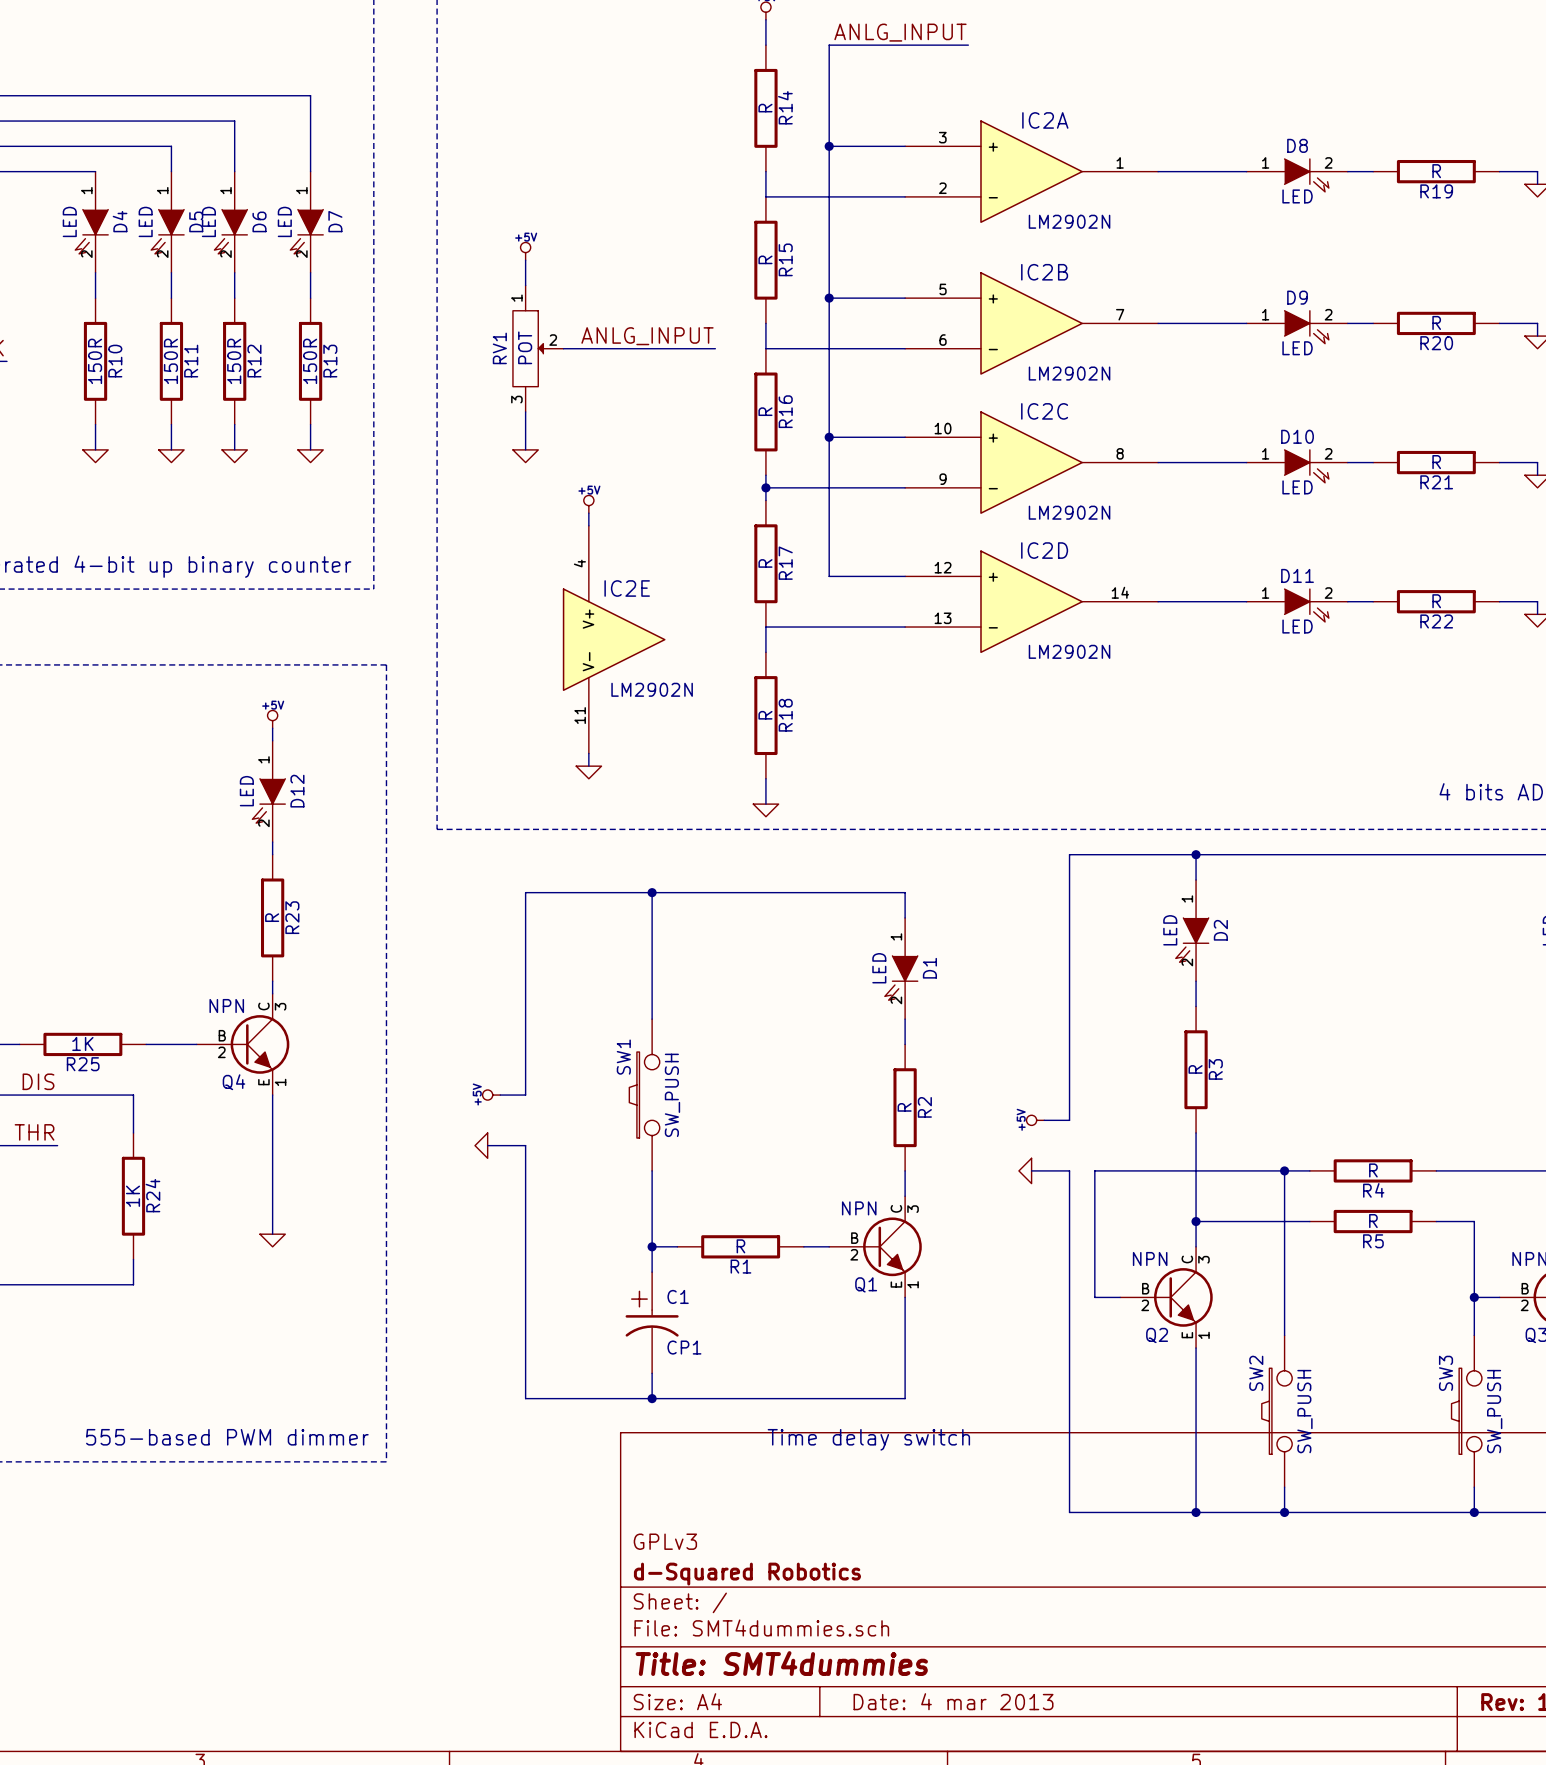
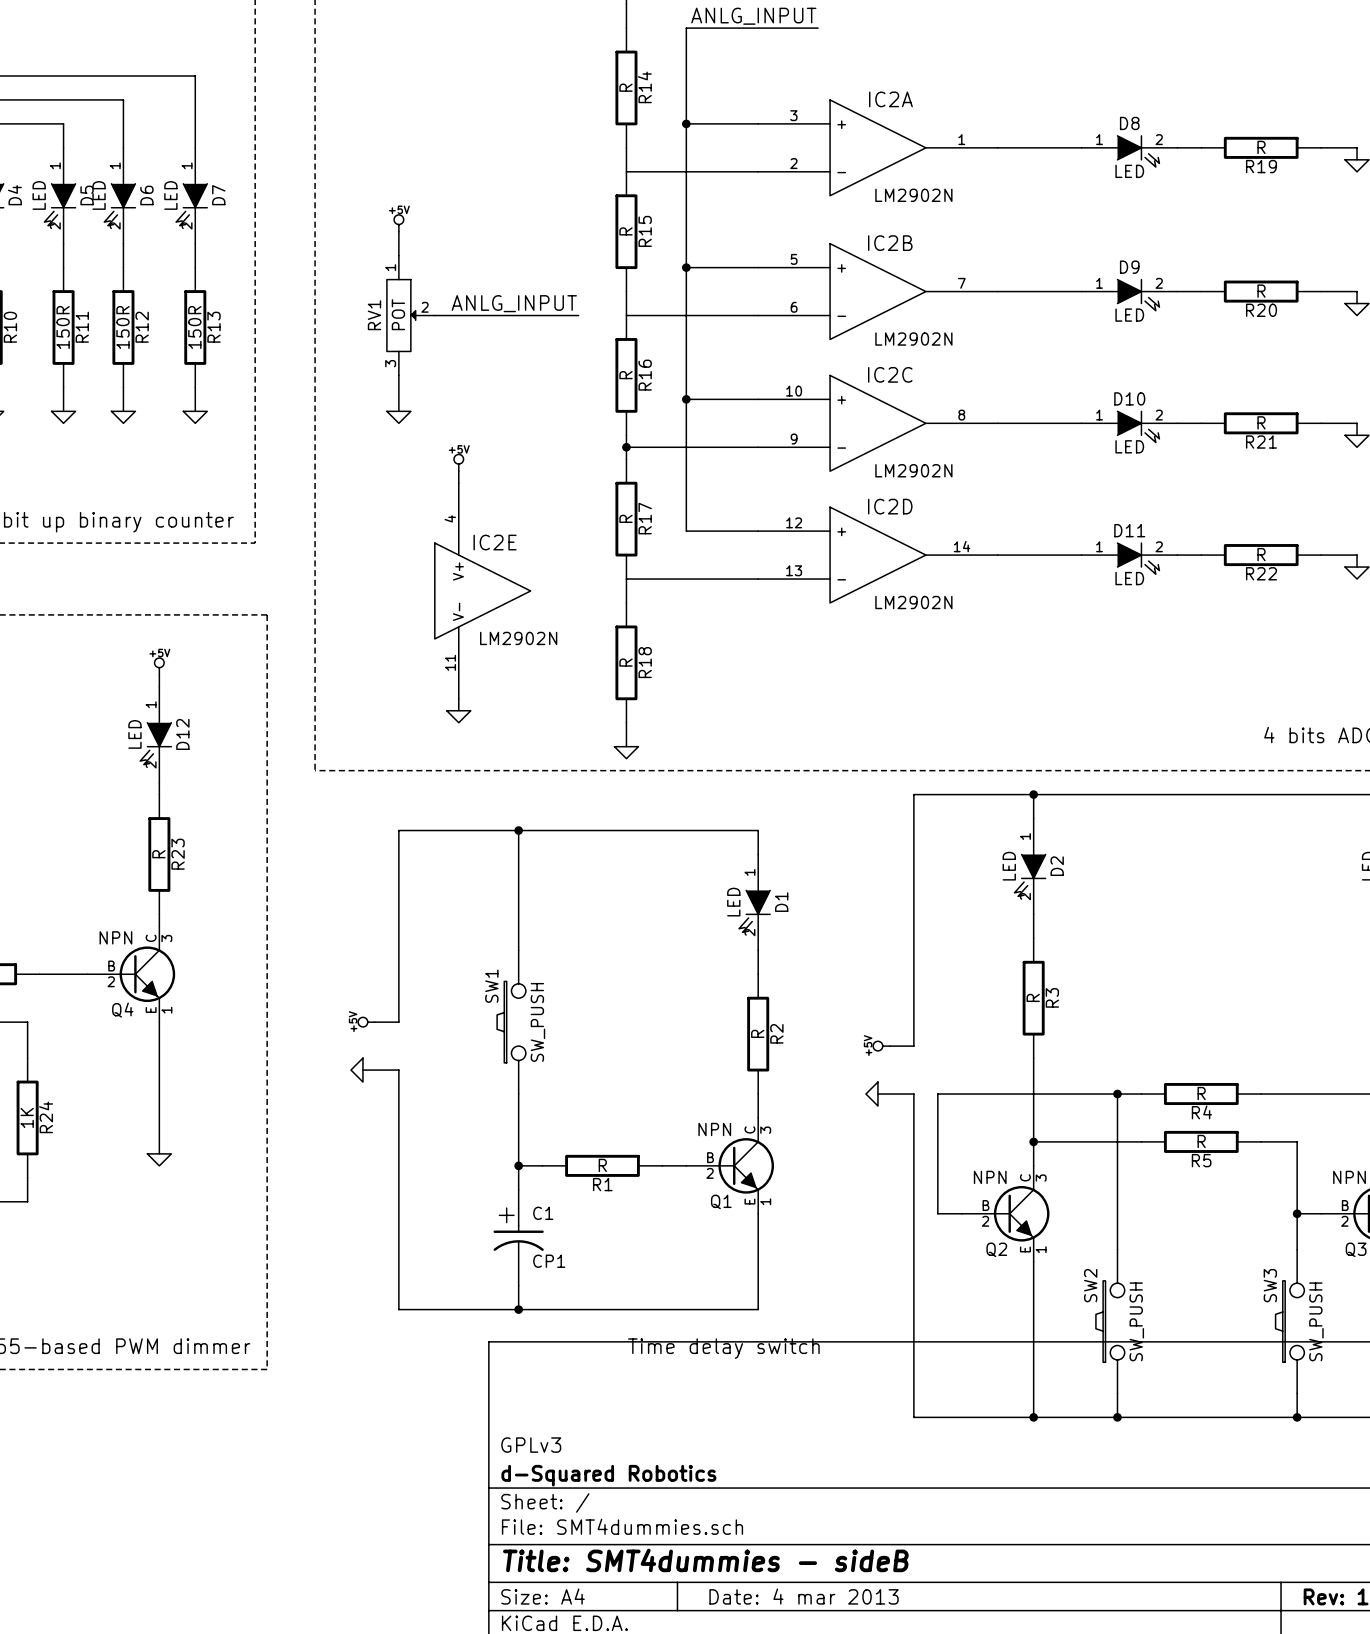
title block: Title: SMT4dummies (781, 1663) -> Title: SMT4dummies - sideB (705, 1560)

